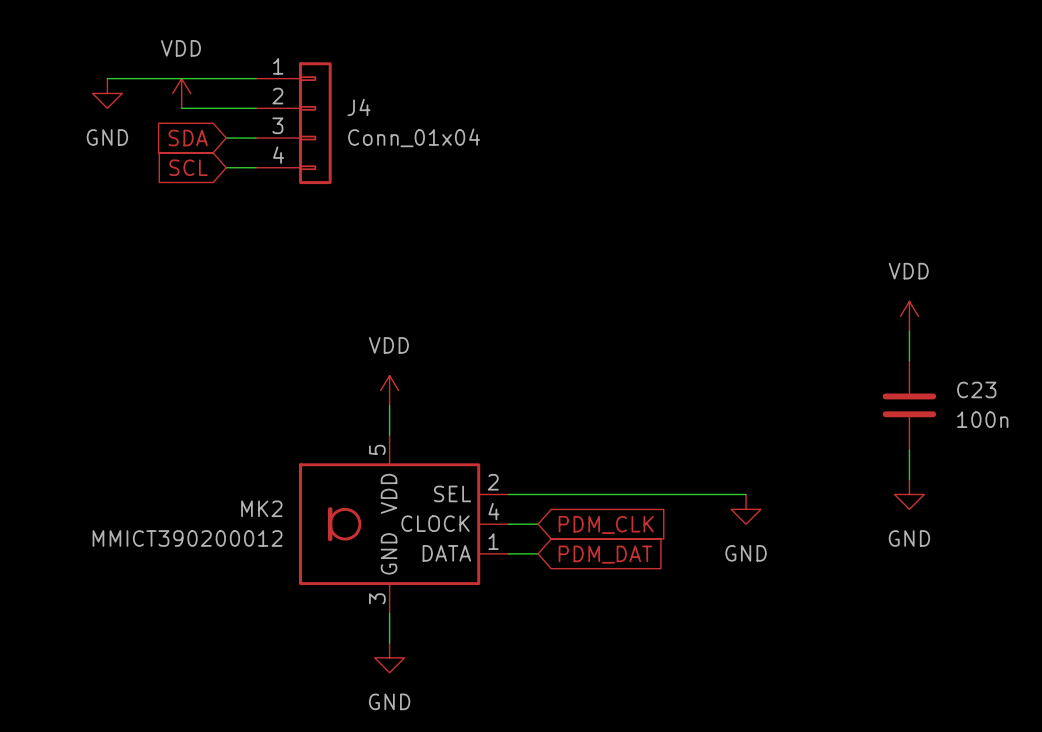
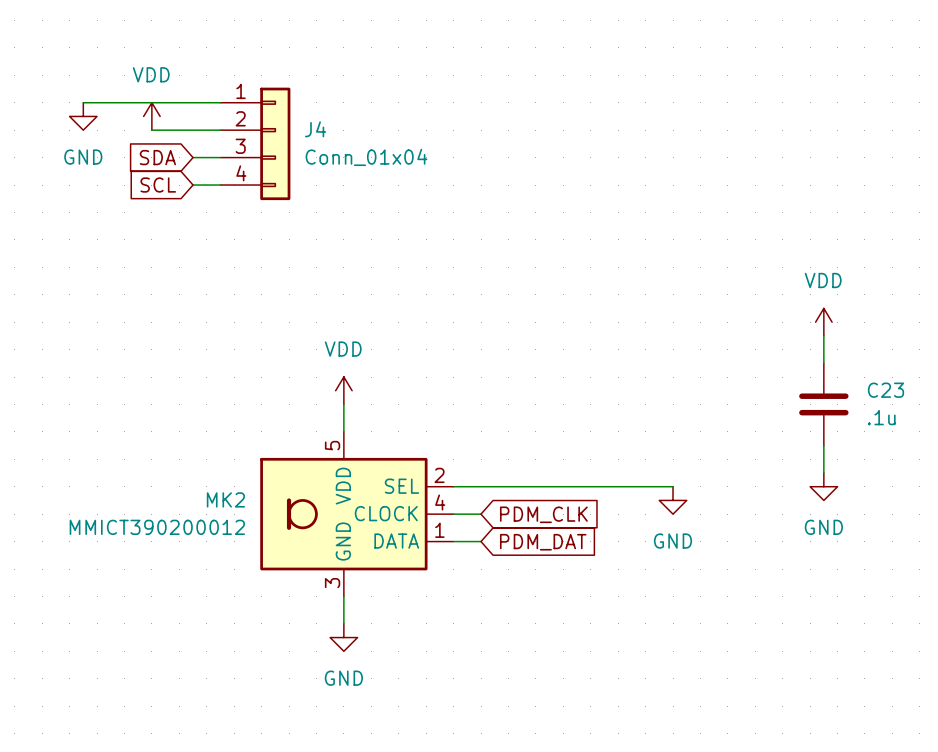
C23 value: 100n (982, 419) -> .1u (881, 417)

